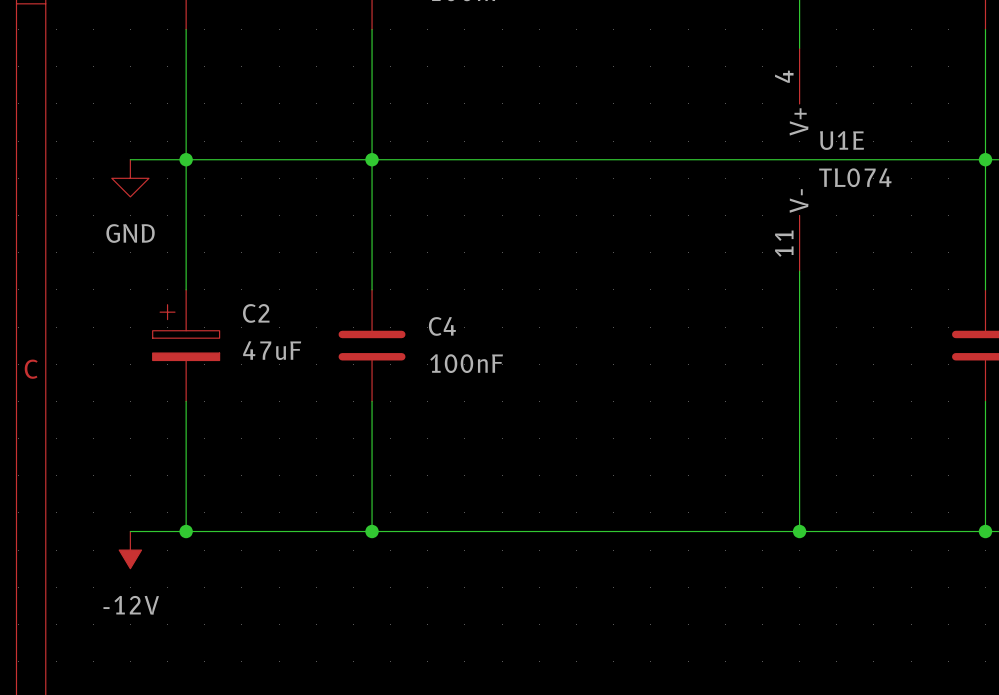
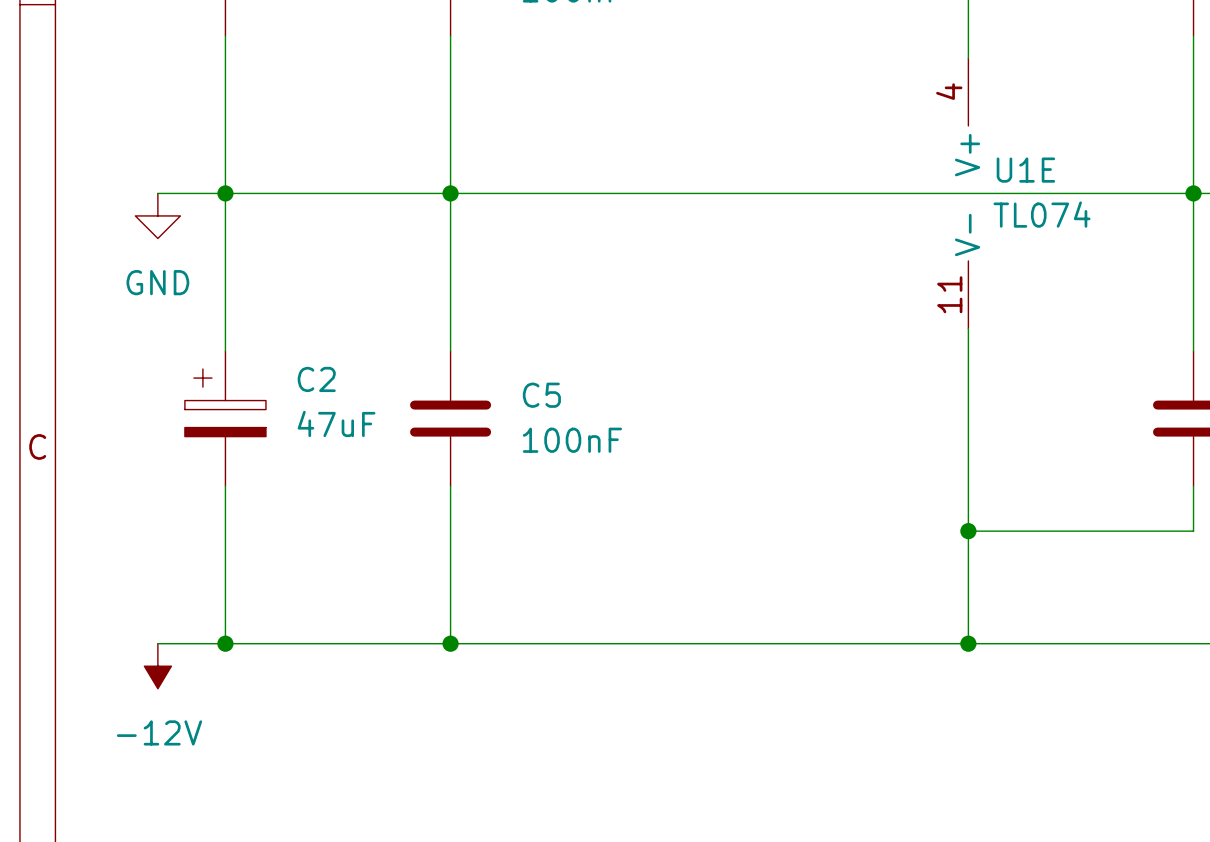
C4 name: C4 (442, 326) -> C5 (541, 395)
junction: none -> (968, 531)
wire: (985, 438) (985, 531) -> (1193, 531) (968, 531)
junction: (985, 531) -> none

